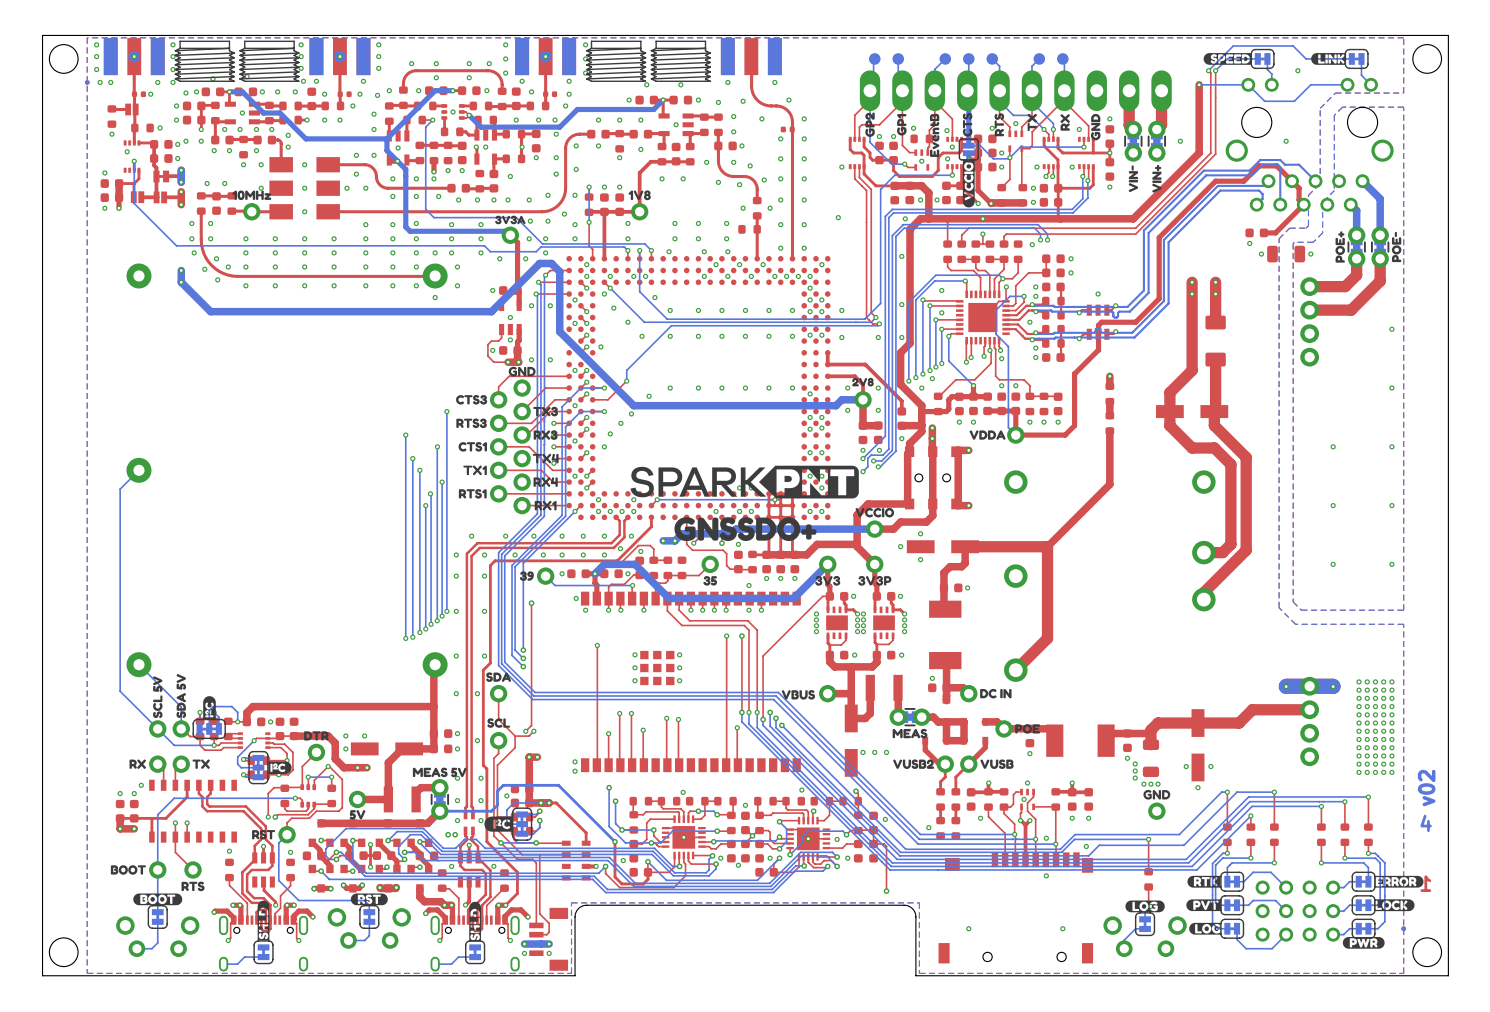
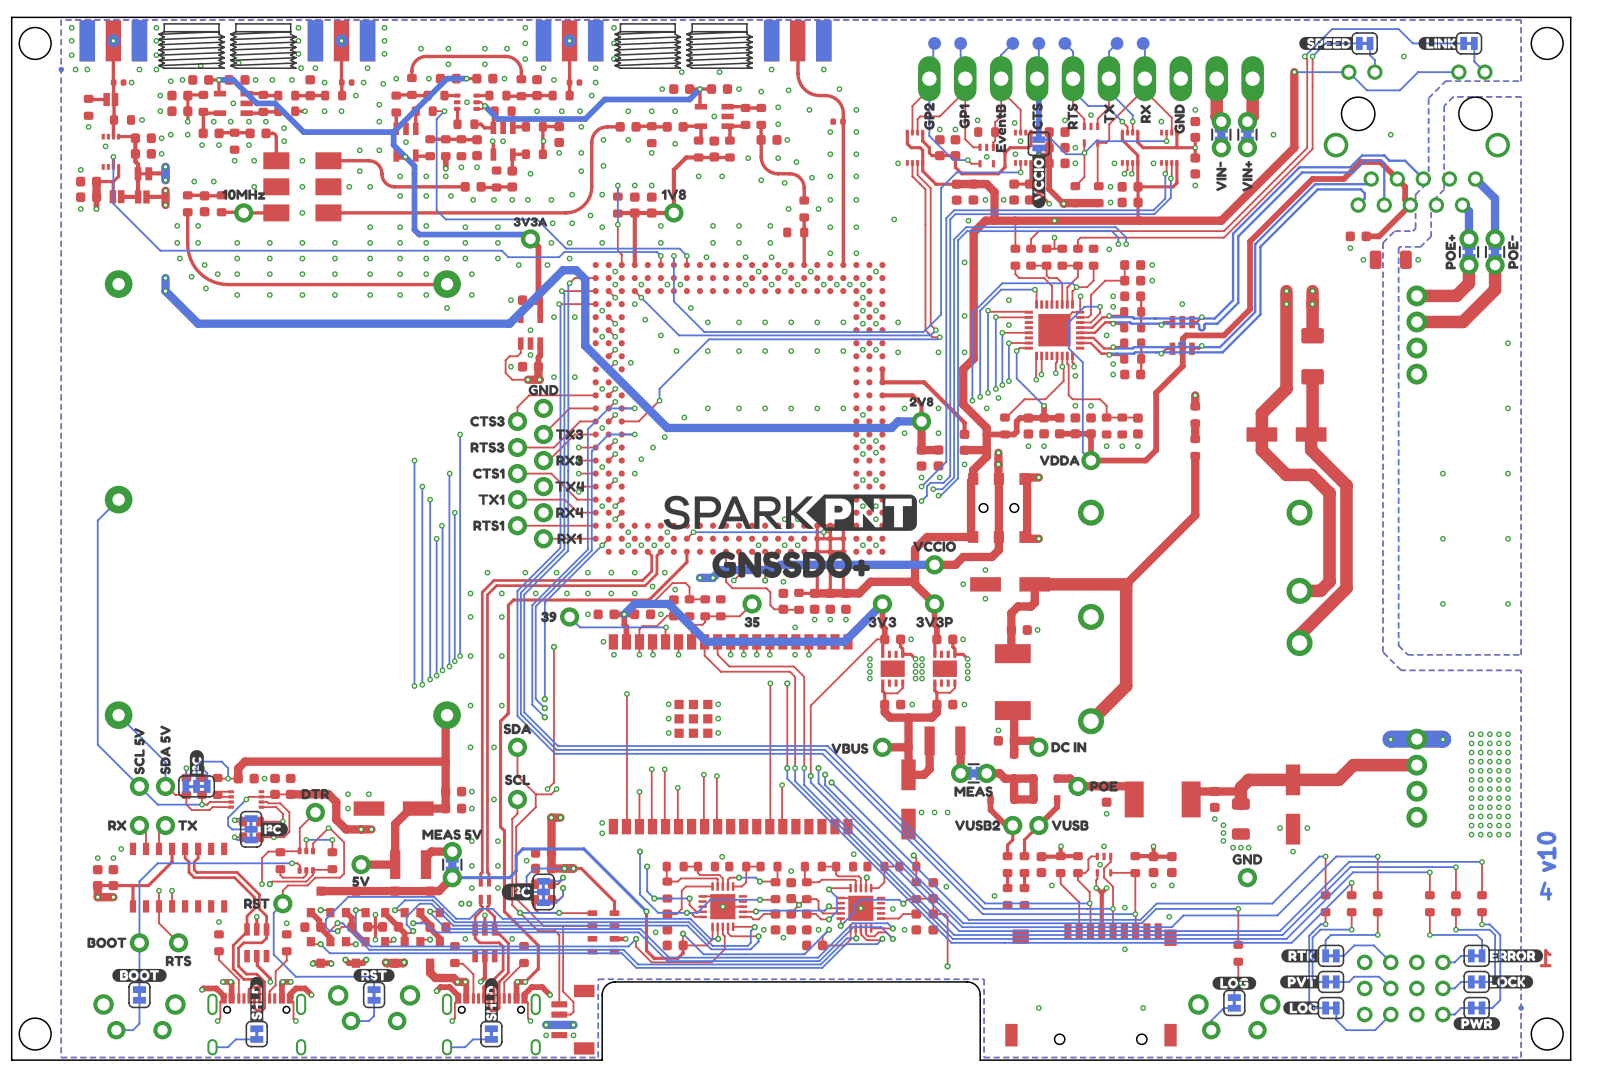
text: v02 (1426, 788) -> v10 (1546, 851)

